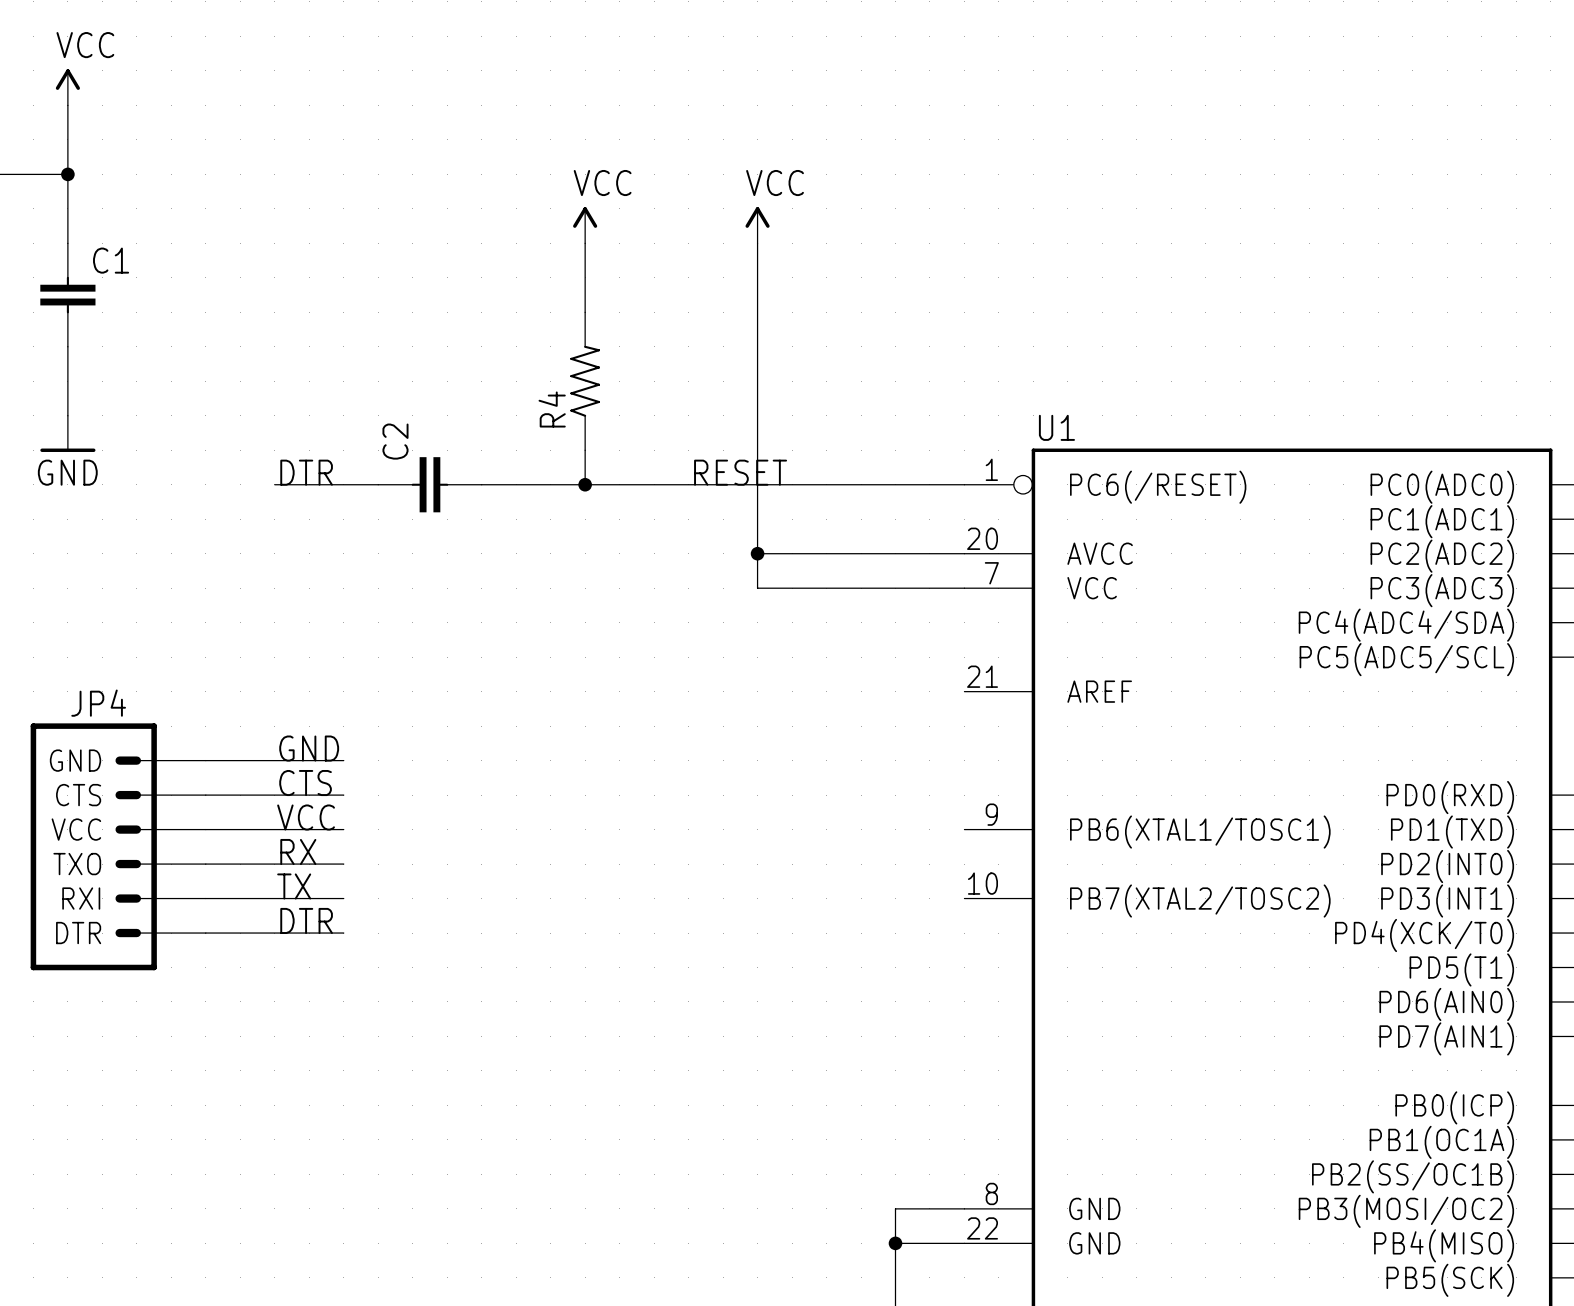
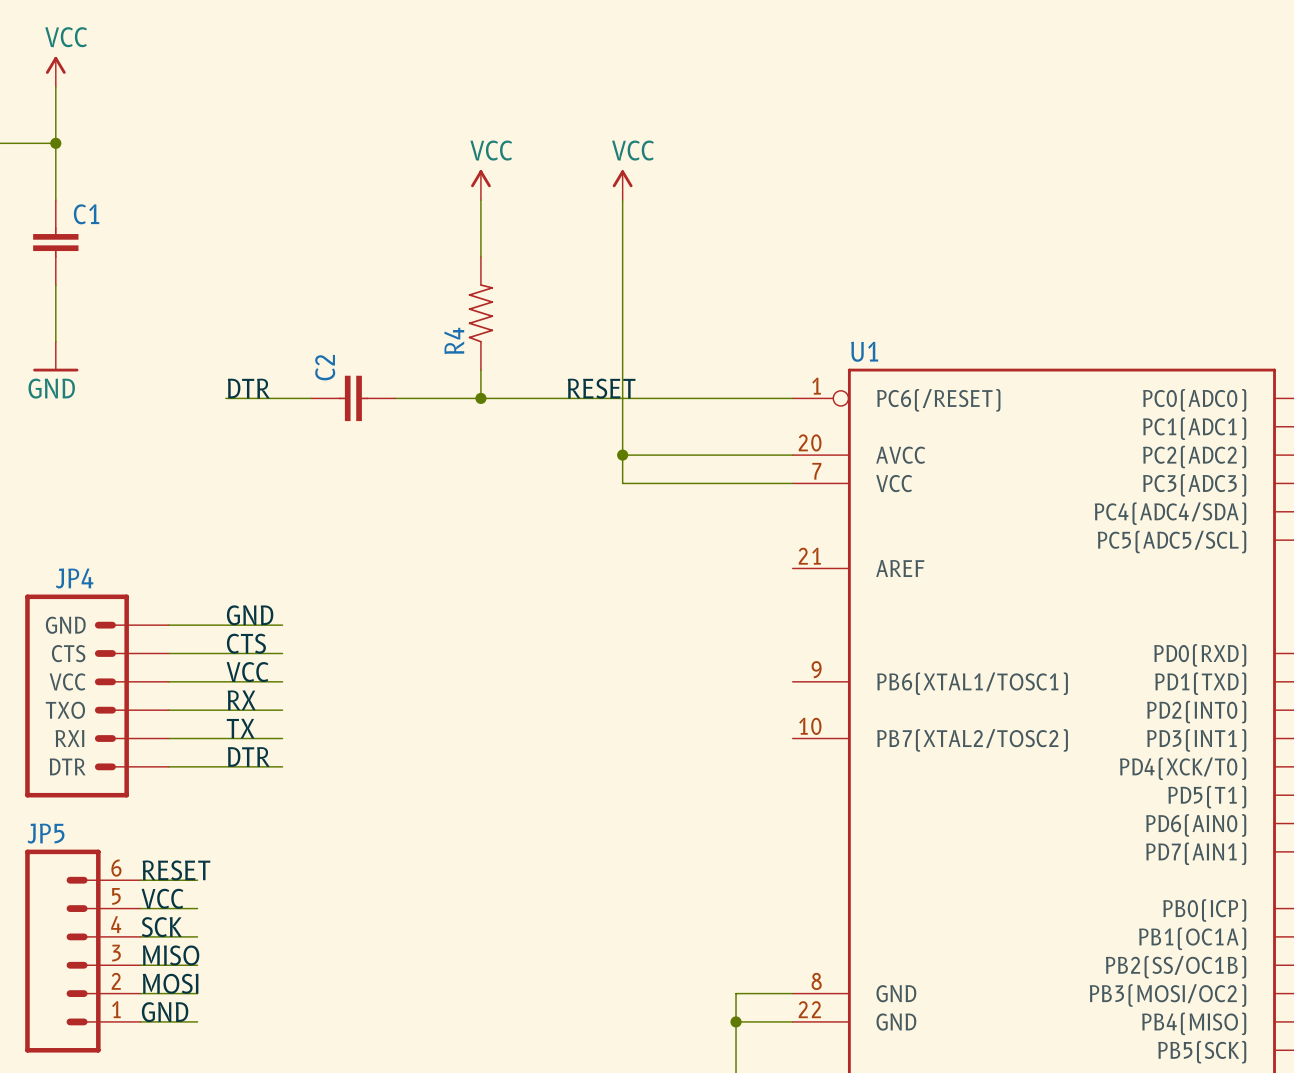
label: none -> RESET (176, 870)
wire: none -> (140, 880) (197, 880)
label: none -> VCC (162, 898)
wire: none -> (140, 908) (197, 908)
label: none -> SCK (161, 927)
wire: none -> (140, 936) (197, 936)
JP5: none -> (83, 951)
label: none -> MISO (171, 955)
wire: none -> (140, 965) (197, 965)
label: none -> MOSI (170, 983)
wire: none -> (140, 993) (197, 993)
label: none -> GND (165, 1012)
wire: none -> (140, 1021) (197, 1021)

